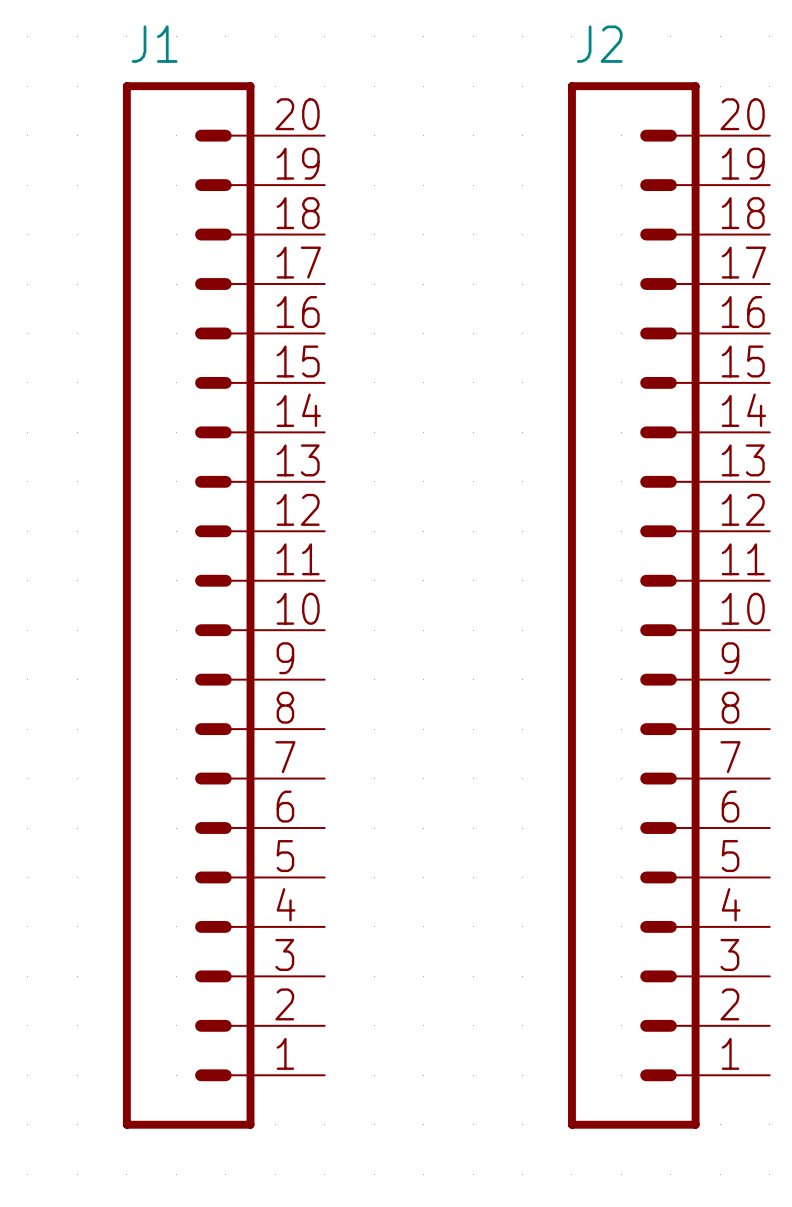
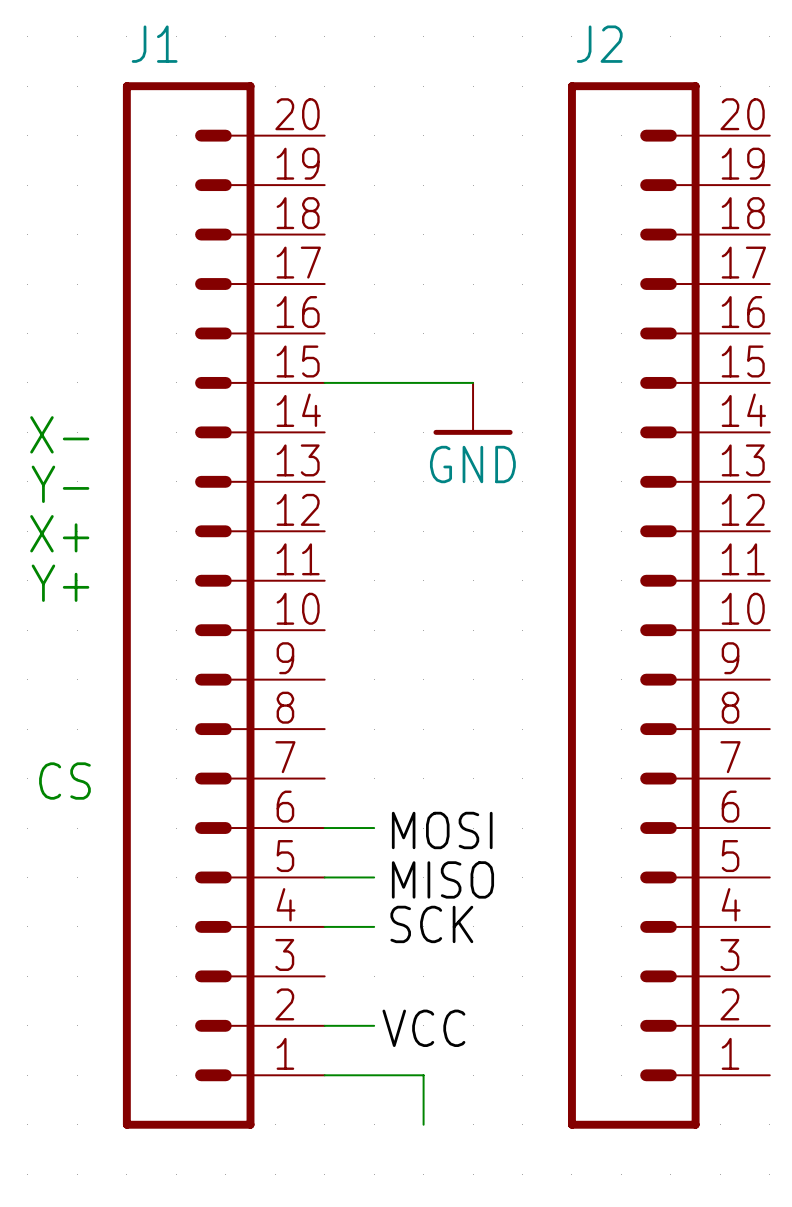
wire: none -> (324, 382) (473, 382)
power symbol: none -> GND (473, 408)
text: none -> X- (59, 434)
text: none -> Y- (60, 484)
text: none -> X+ (59, 533)
text: none -> Y+ (60, 583)
text: none -> CS (64, 781)
wire: none -> (324, 828) (374, 828)
label: none -> MOSI (442, 830)
wire: none -> (324, 877) (374, 877)
label: none -> MISO (442, 879)
label: none -> SCK (431, 924)
wire: none -> (324, 926) (374, 926)
wire: none -> (324, 1025) (374, 1025)
label: none -> VCC (423, 1028)
wire: none -> (324, 1075) (423, 1075) (423, 1124)

